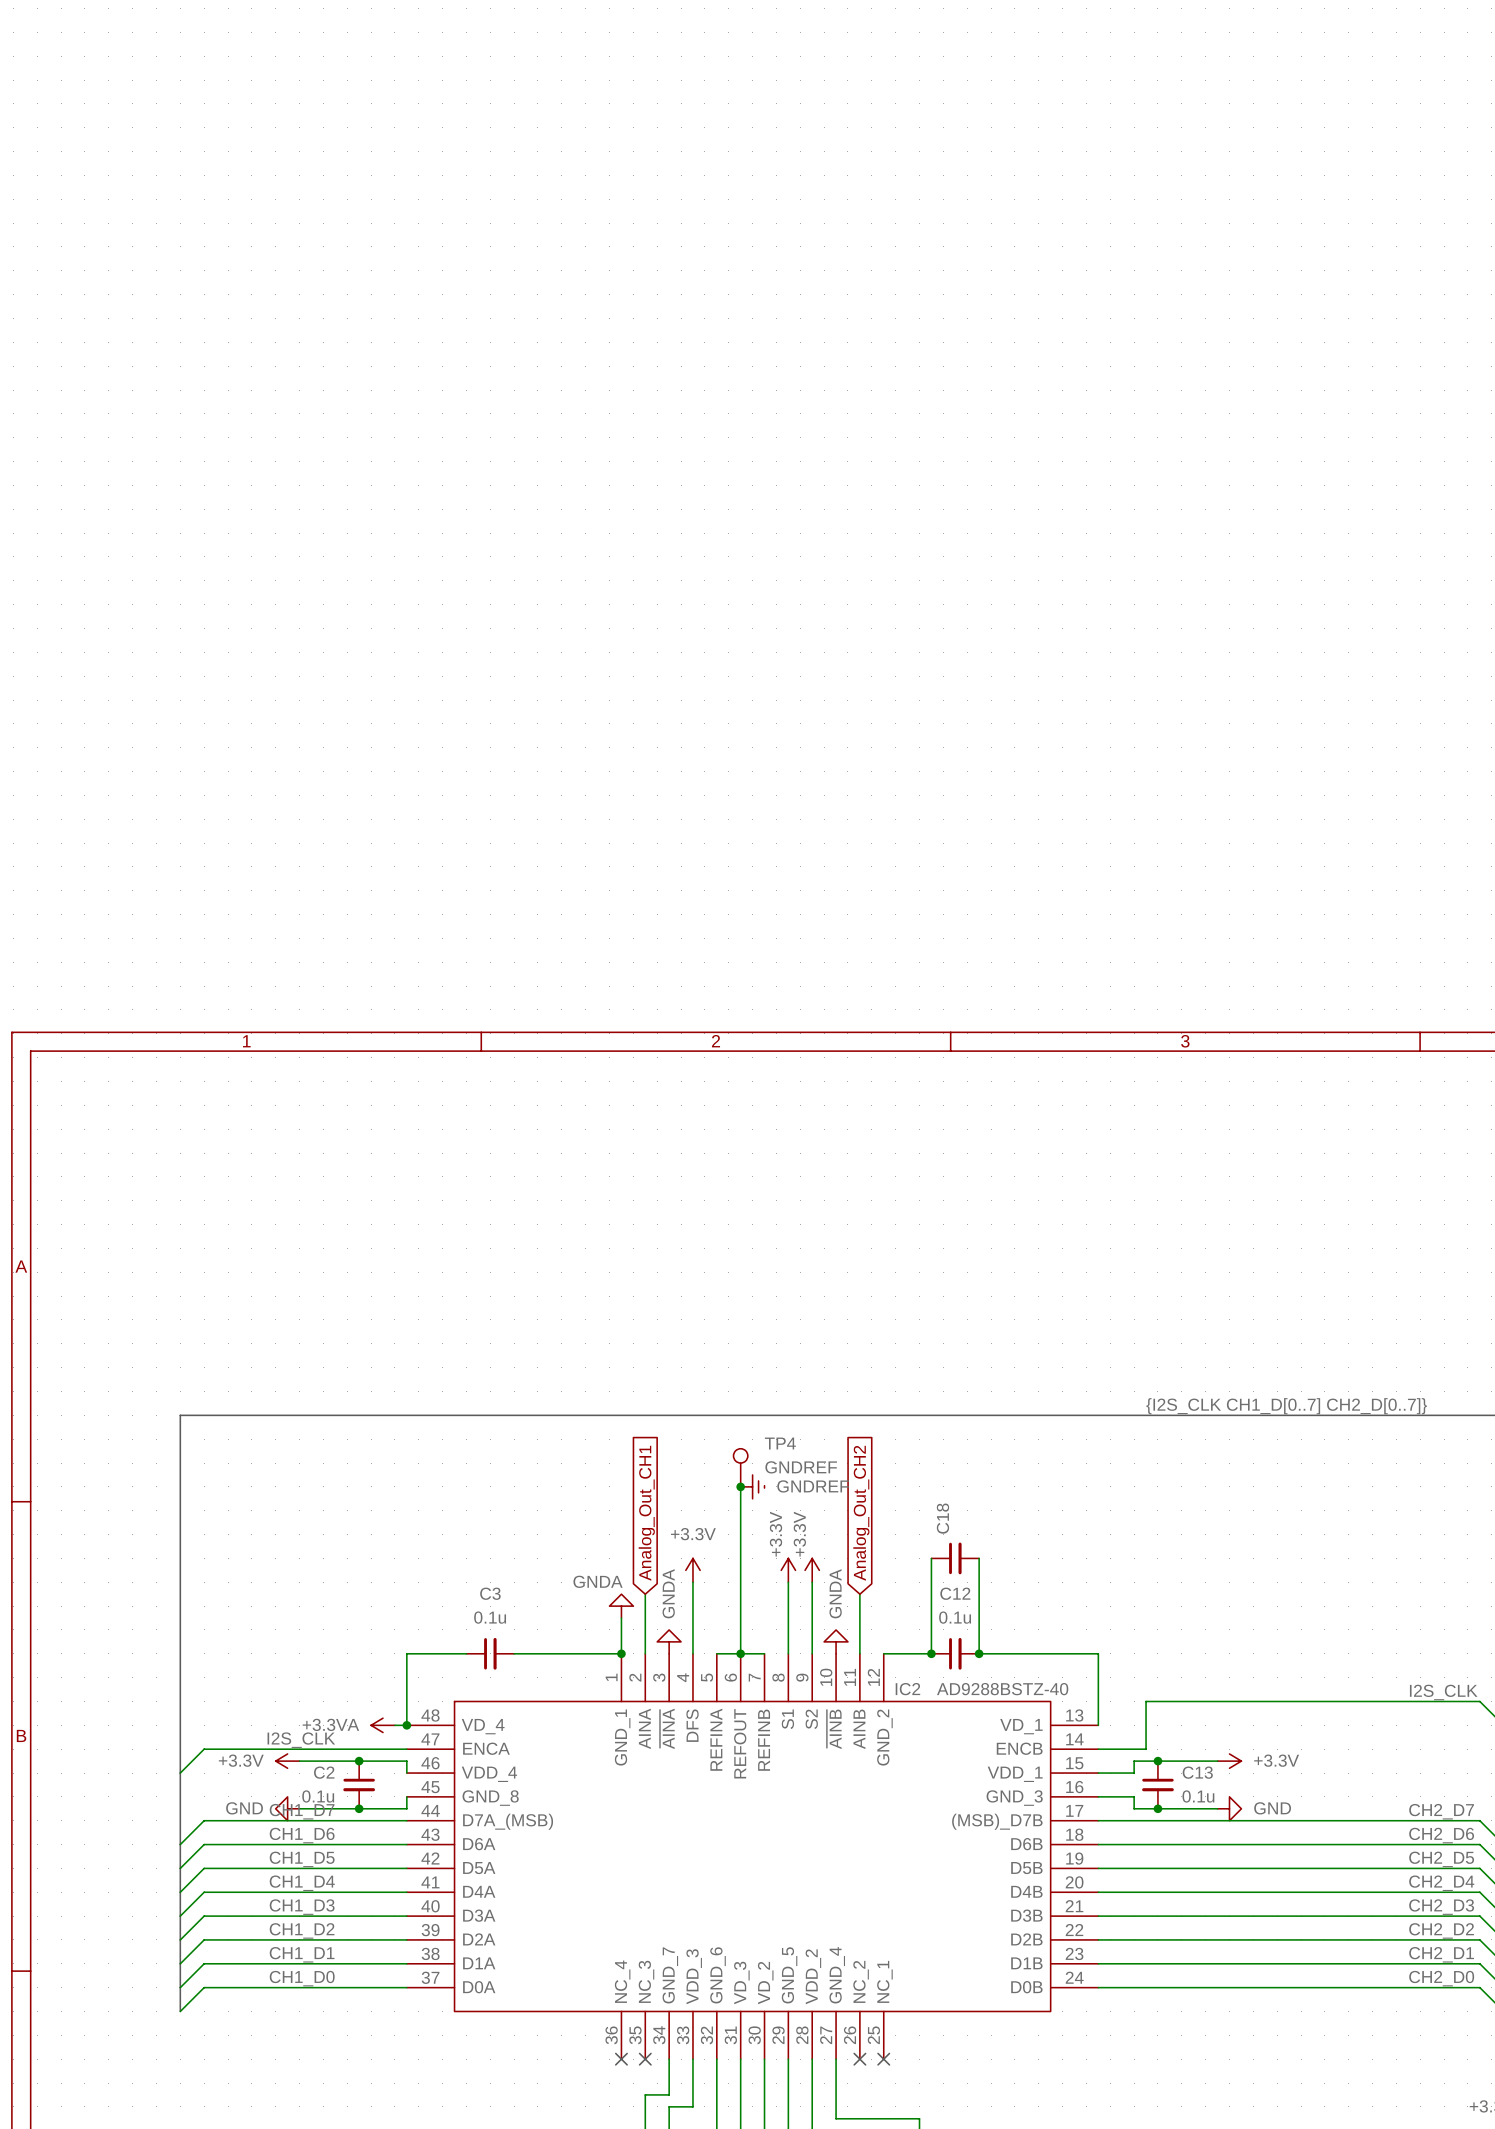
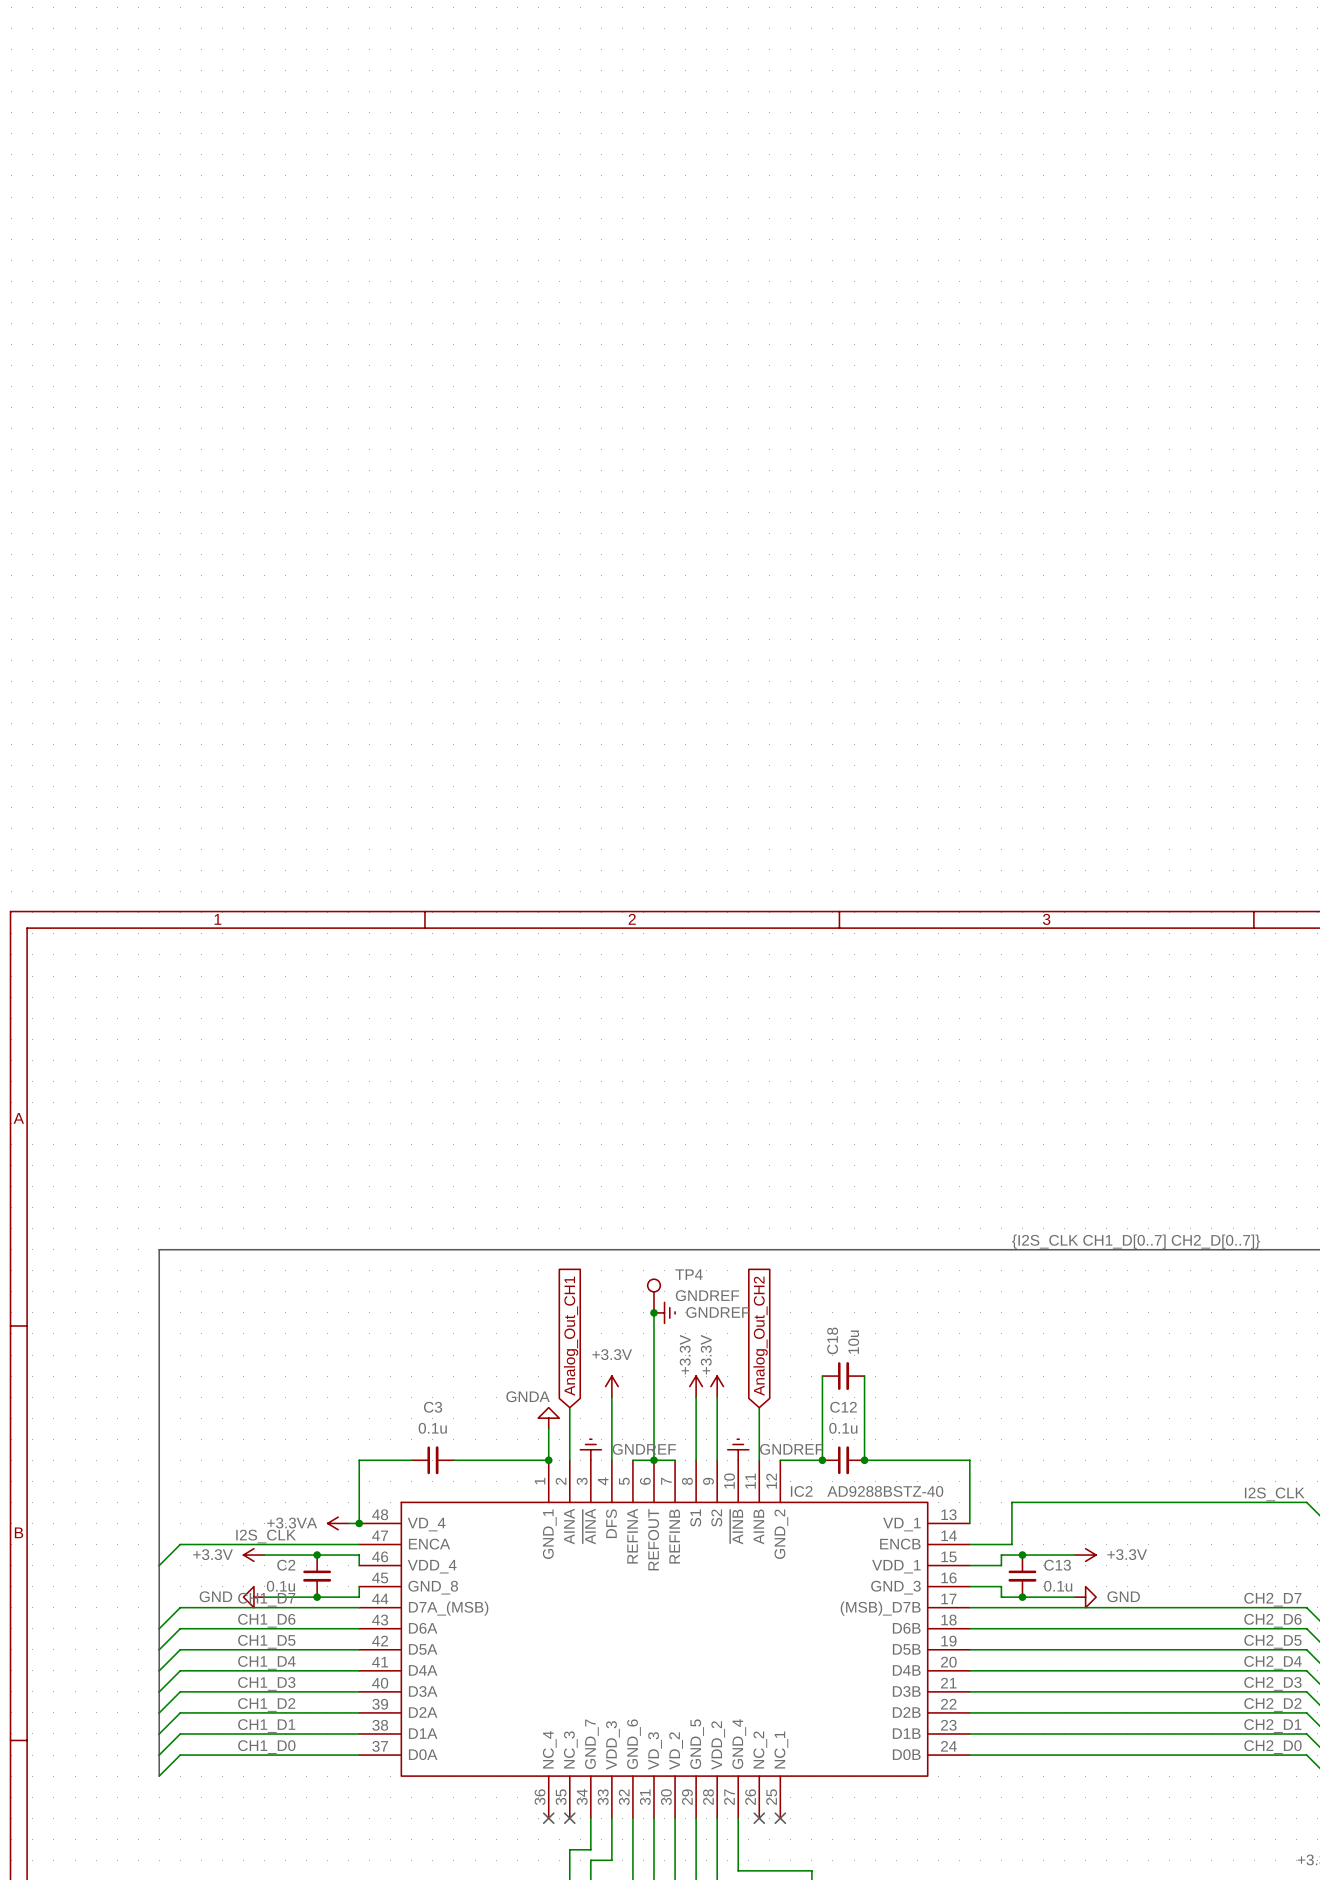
C18 value: none -> 10u (853, 1342)
power symbol: GNDA (669, 1641) -> GNDREF (590, 1449)
power symbol: GNDA (836, 1641) -> GNDREF (738, 1449)

